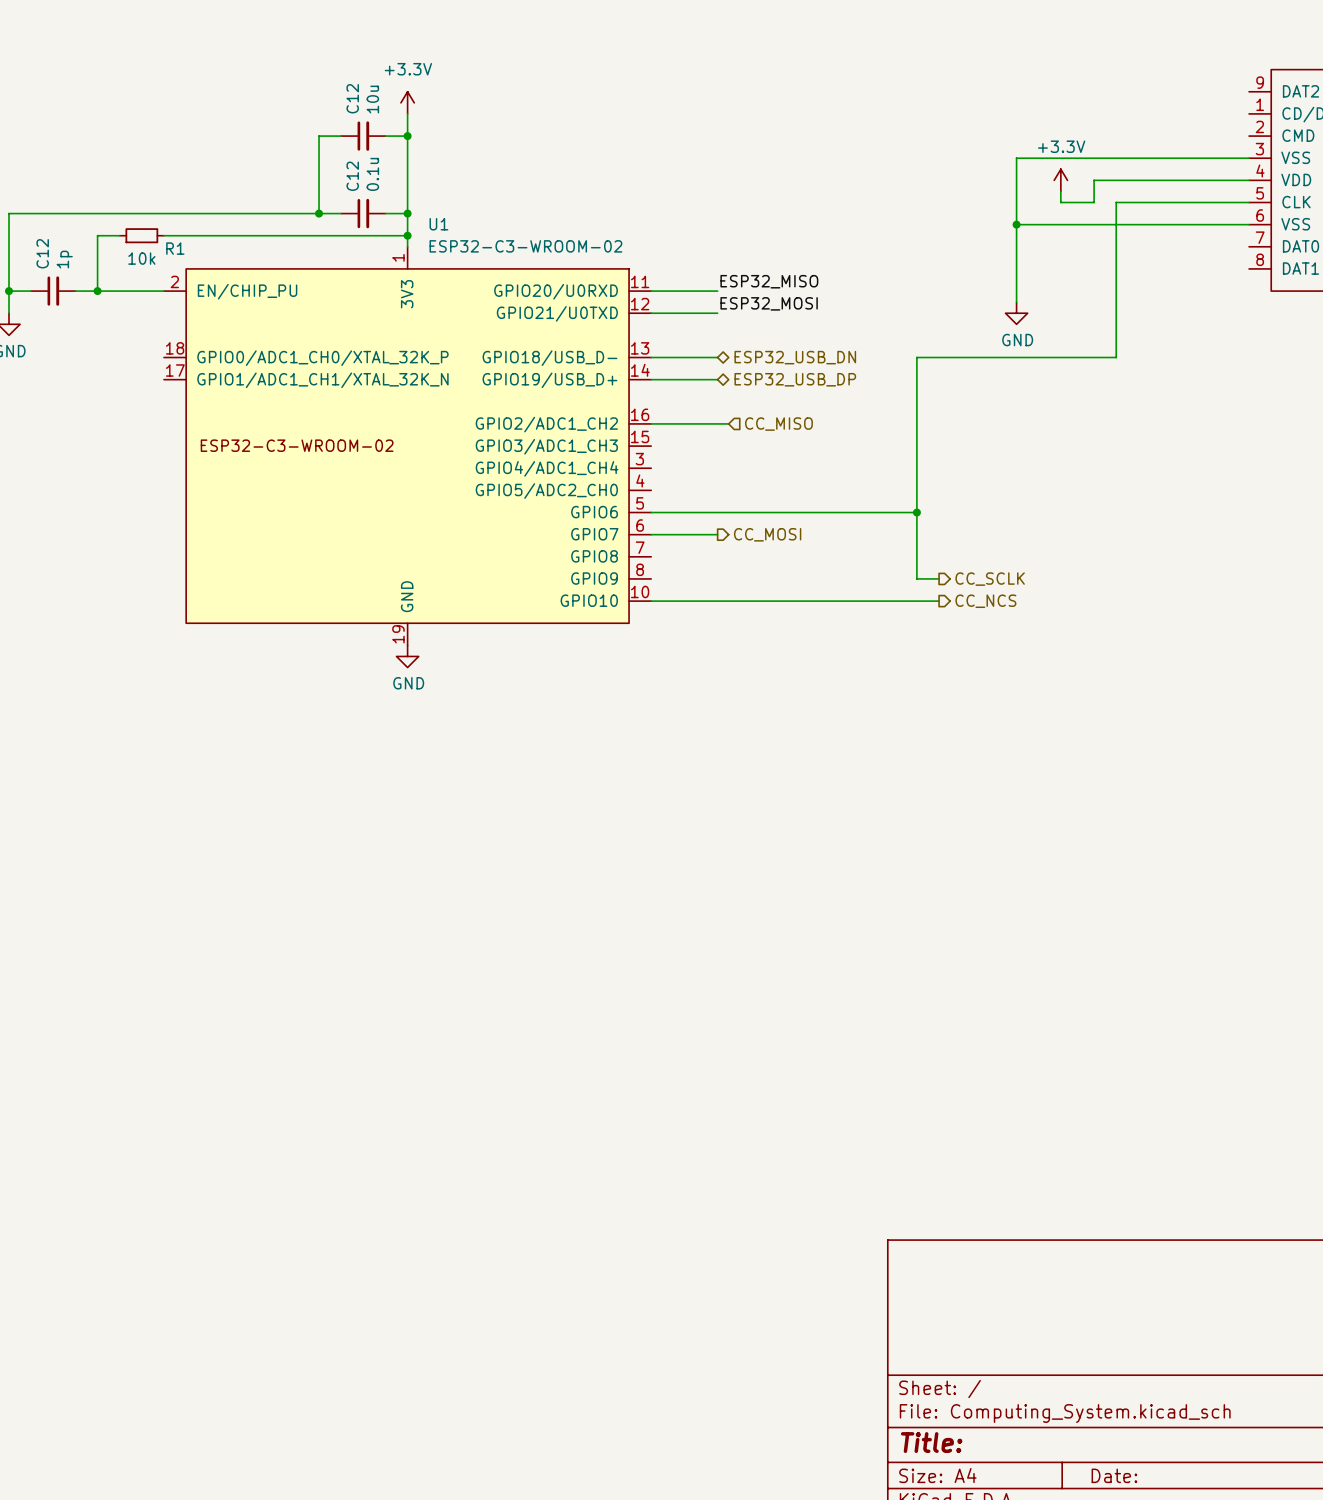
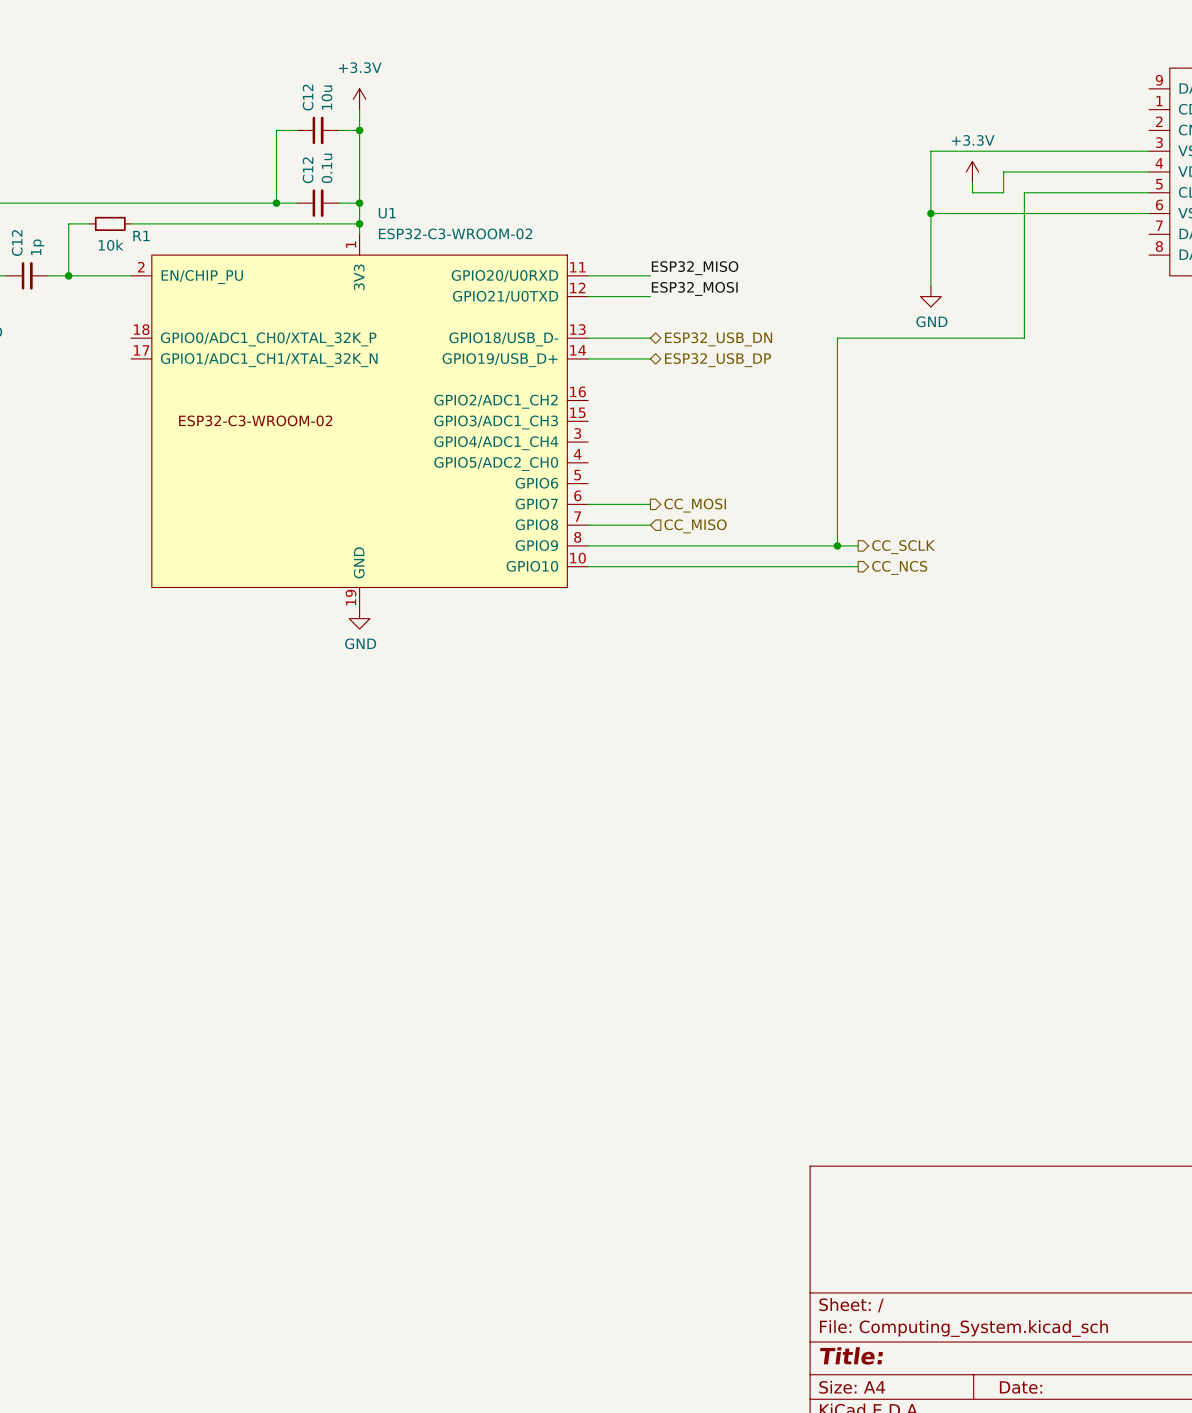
wire: (651, 423) (728, 423) -> none
hierarchical label position: CC_MISO (778, 424) -> CC_MISO (695, 526)
wire: (651, 512) (916, 512) -> (588, 545) (837, 545)
junction: (916, 512) -> none
wire: none -> (588, 525) (650, 525)
junction: none -> (837, 545)

